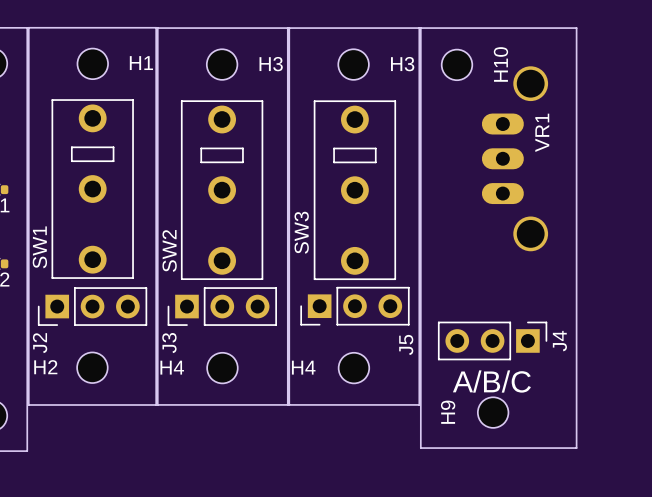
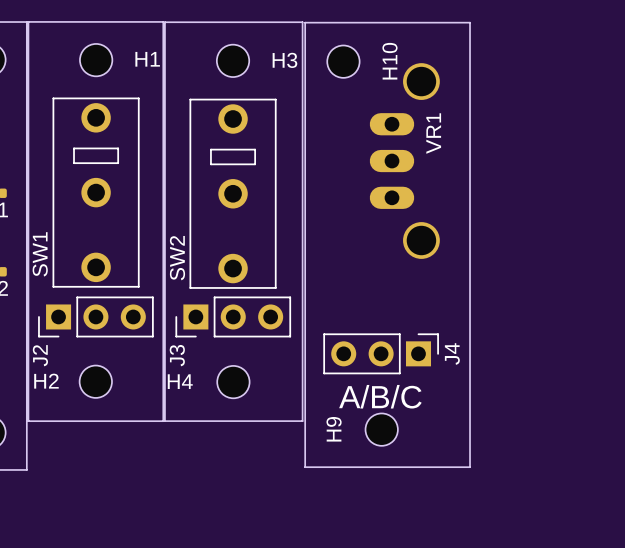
board edge: (289, 28) (419, 28) (419, 404) (289, 404) (289, 28) -> none
board edge: (420, 28) (576, 28) (576, 448) (420, 448) (420, 28) -> (305, 22) (470, 22) (470, 467) (305, 467) (305, 22)
H3: (353, 64) -> none
H10 position: (456, 64) -> (343, 61)
VR1 position: (514, 158) -> (404, 161)
SW3: (354, 190) -> none
J5: (354, 306) -> none
J4 position: (492, 340) -> (381, 353)
H4: (353, 368) -> none
text position: A/B/C (491, 381) -> A/B/C (380, 396)
H9 position: (493, 412) -> (381, 429)

